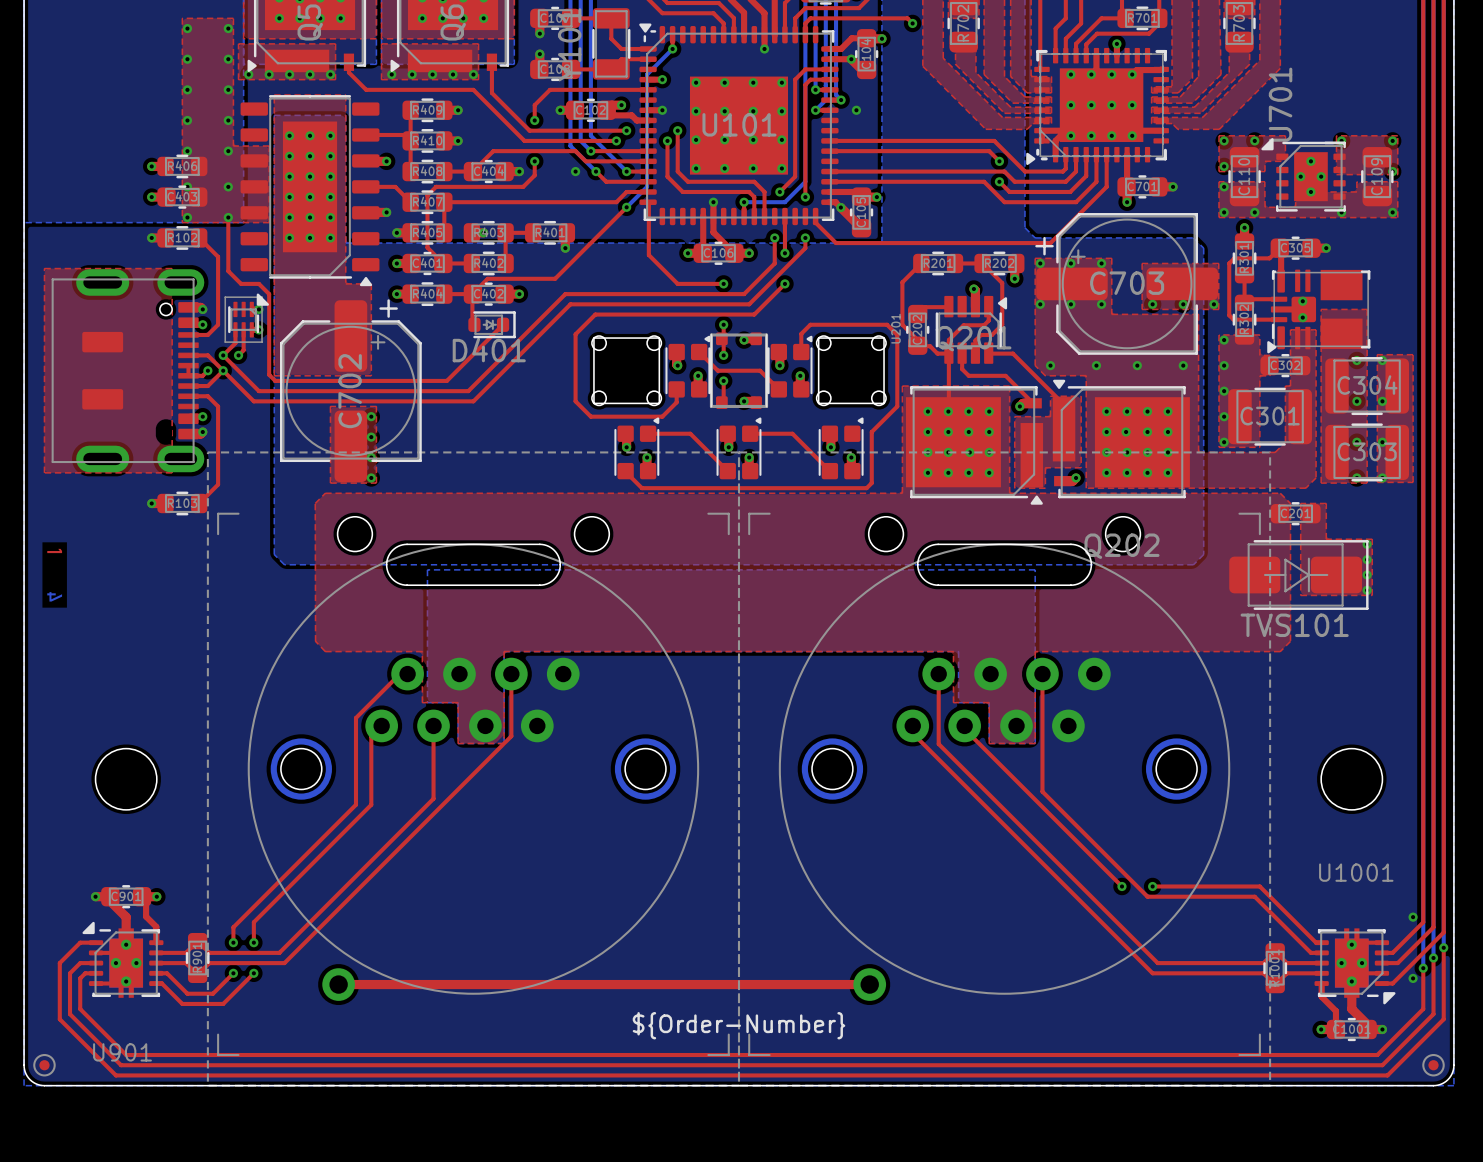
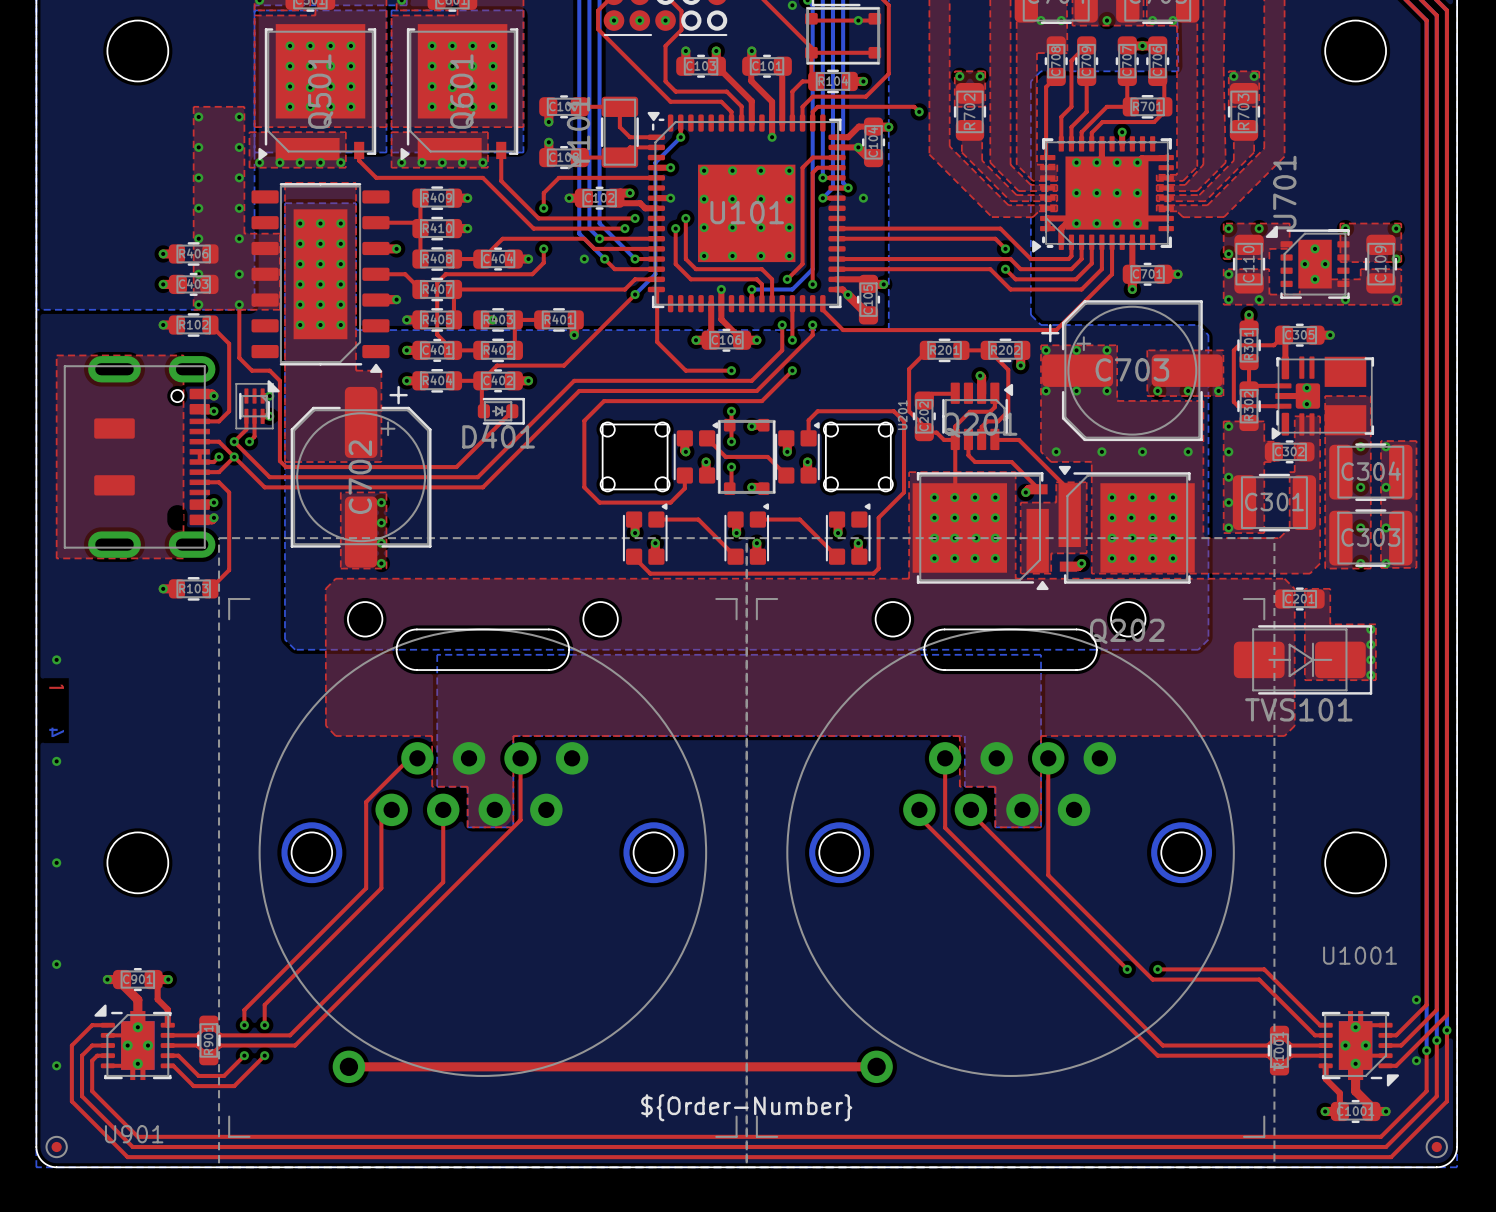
via: none -> (56, 659)
drawing position: (54, 575) -> (56, 710)
via: none -> (56, 761)
via: none -> (56, 862)
via: none -> (56, 964)
via: none -> (56, 1065)

